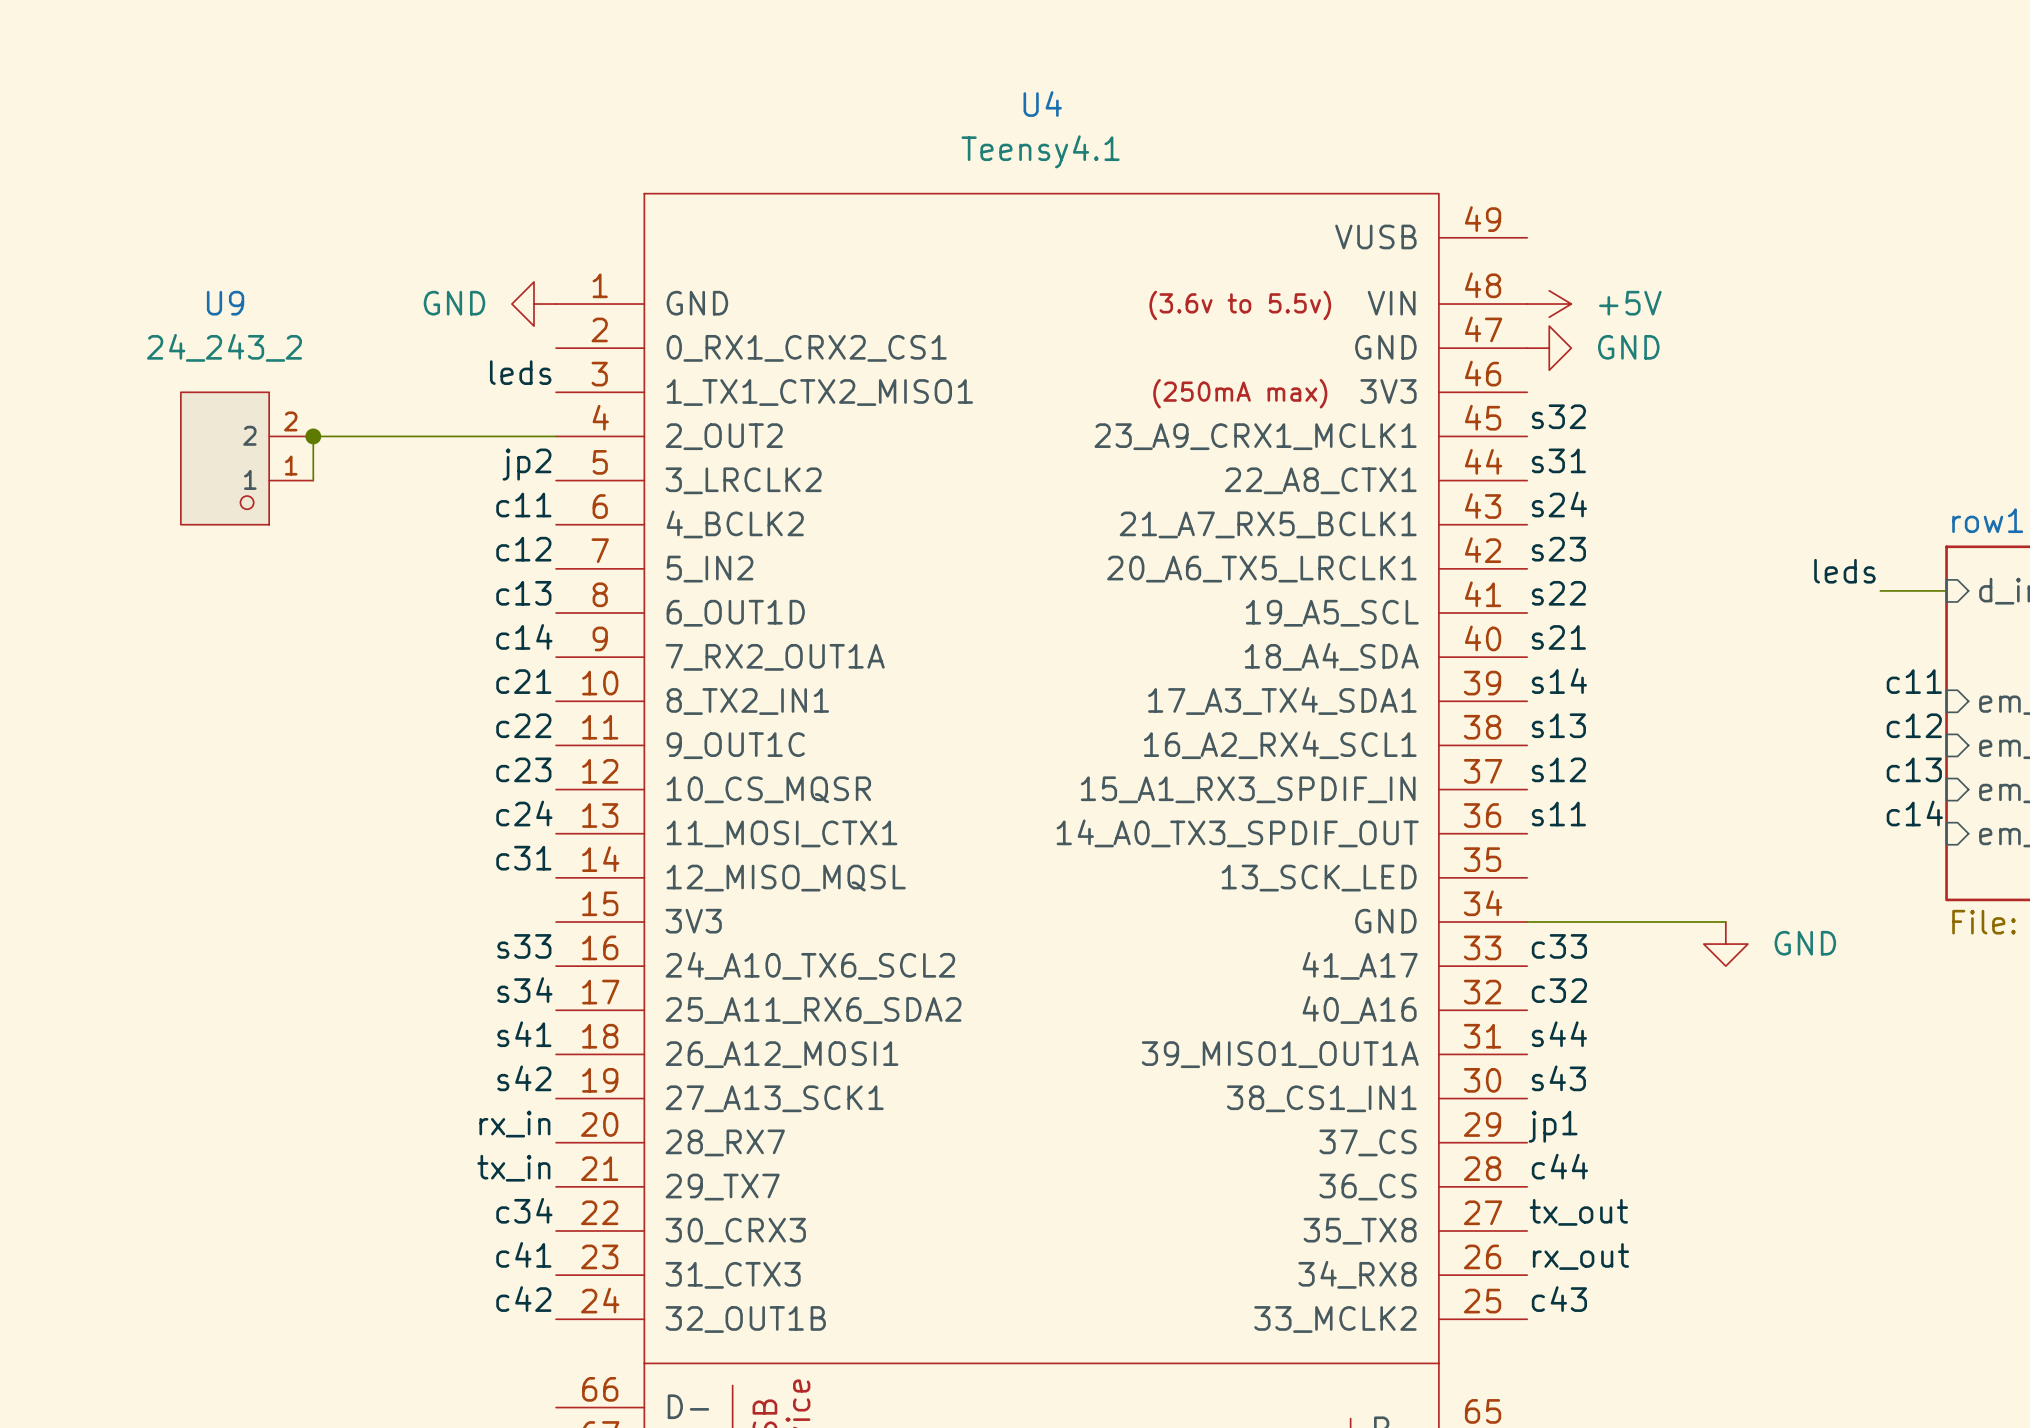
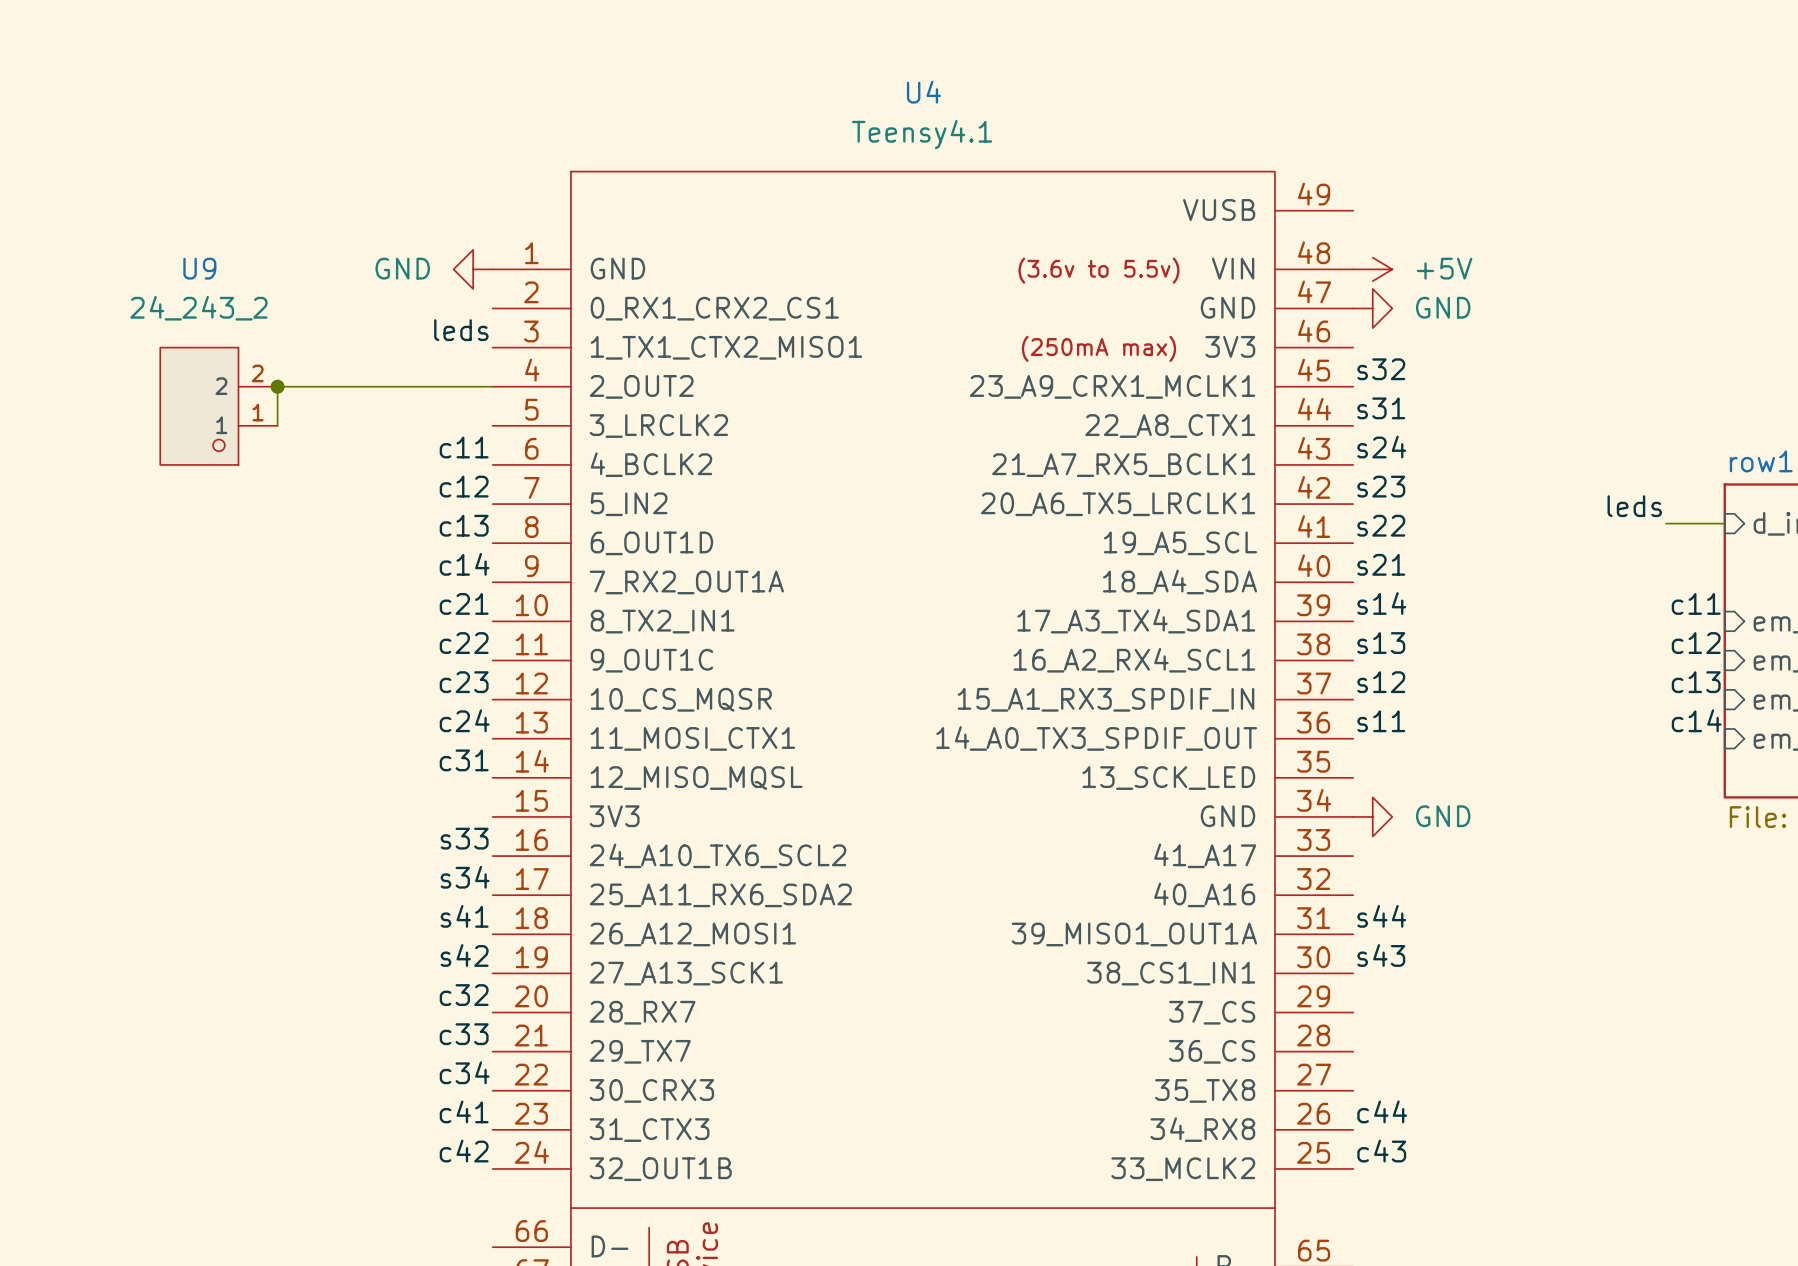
label: jp2 (527, 464) -> none
wire: (1527, 921) (1725, 921) -> none
power symbol rotation: 0° (1725, 944) -> 90° counterclockwise (1372, 816)
power symbol position: GND (1725, 944) -> GND (1372, 816)
label: c33 (1559, 946) -> none
label: c32 (1559, 990) -> none
label: rx_in (514, 1124) -> c32 (464, 995)
label: jp1 (1553, 1126) -> none
label: c44 (1559, 1166) -> none
label: tx_in (513, 1168) -> c33 (464, 1034)
label: tx_out (1578, 1212) -> none
label: rx_out (1580, 1256) -> c44 (1382, 1111)

